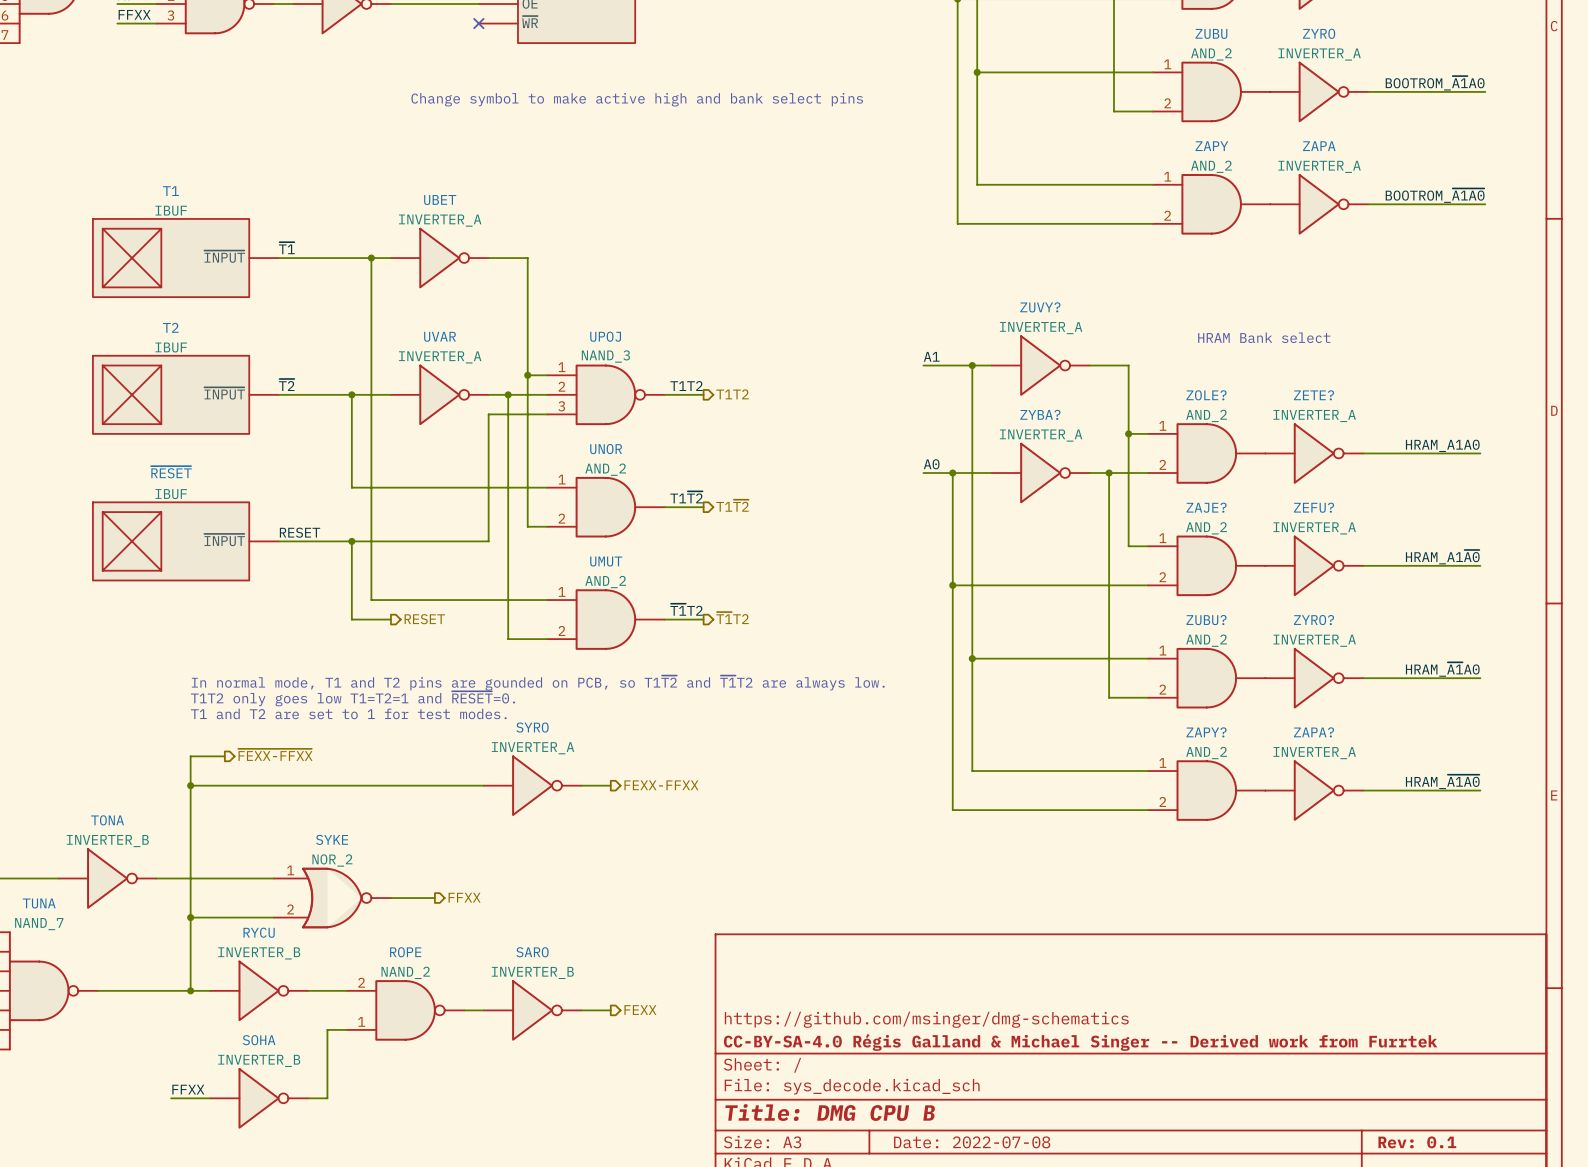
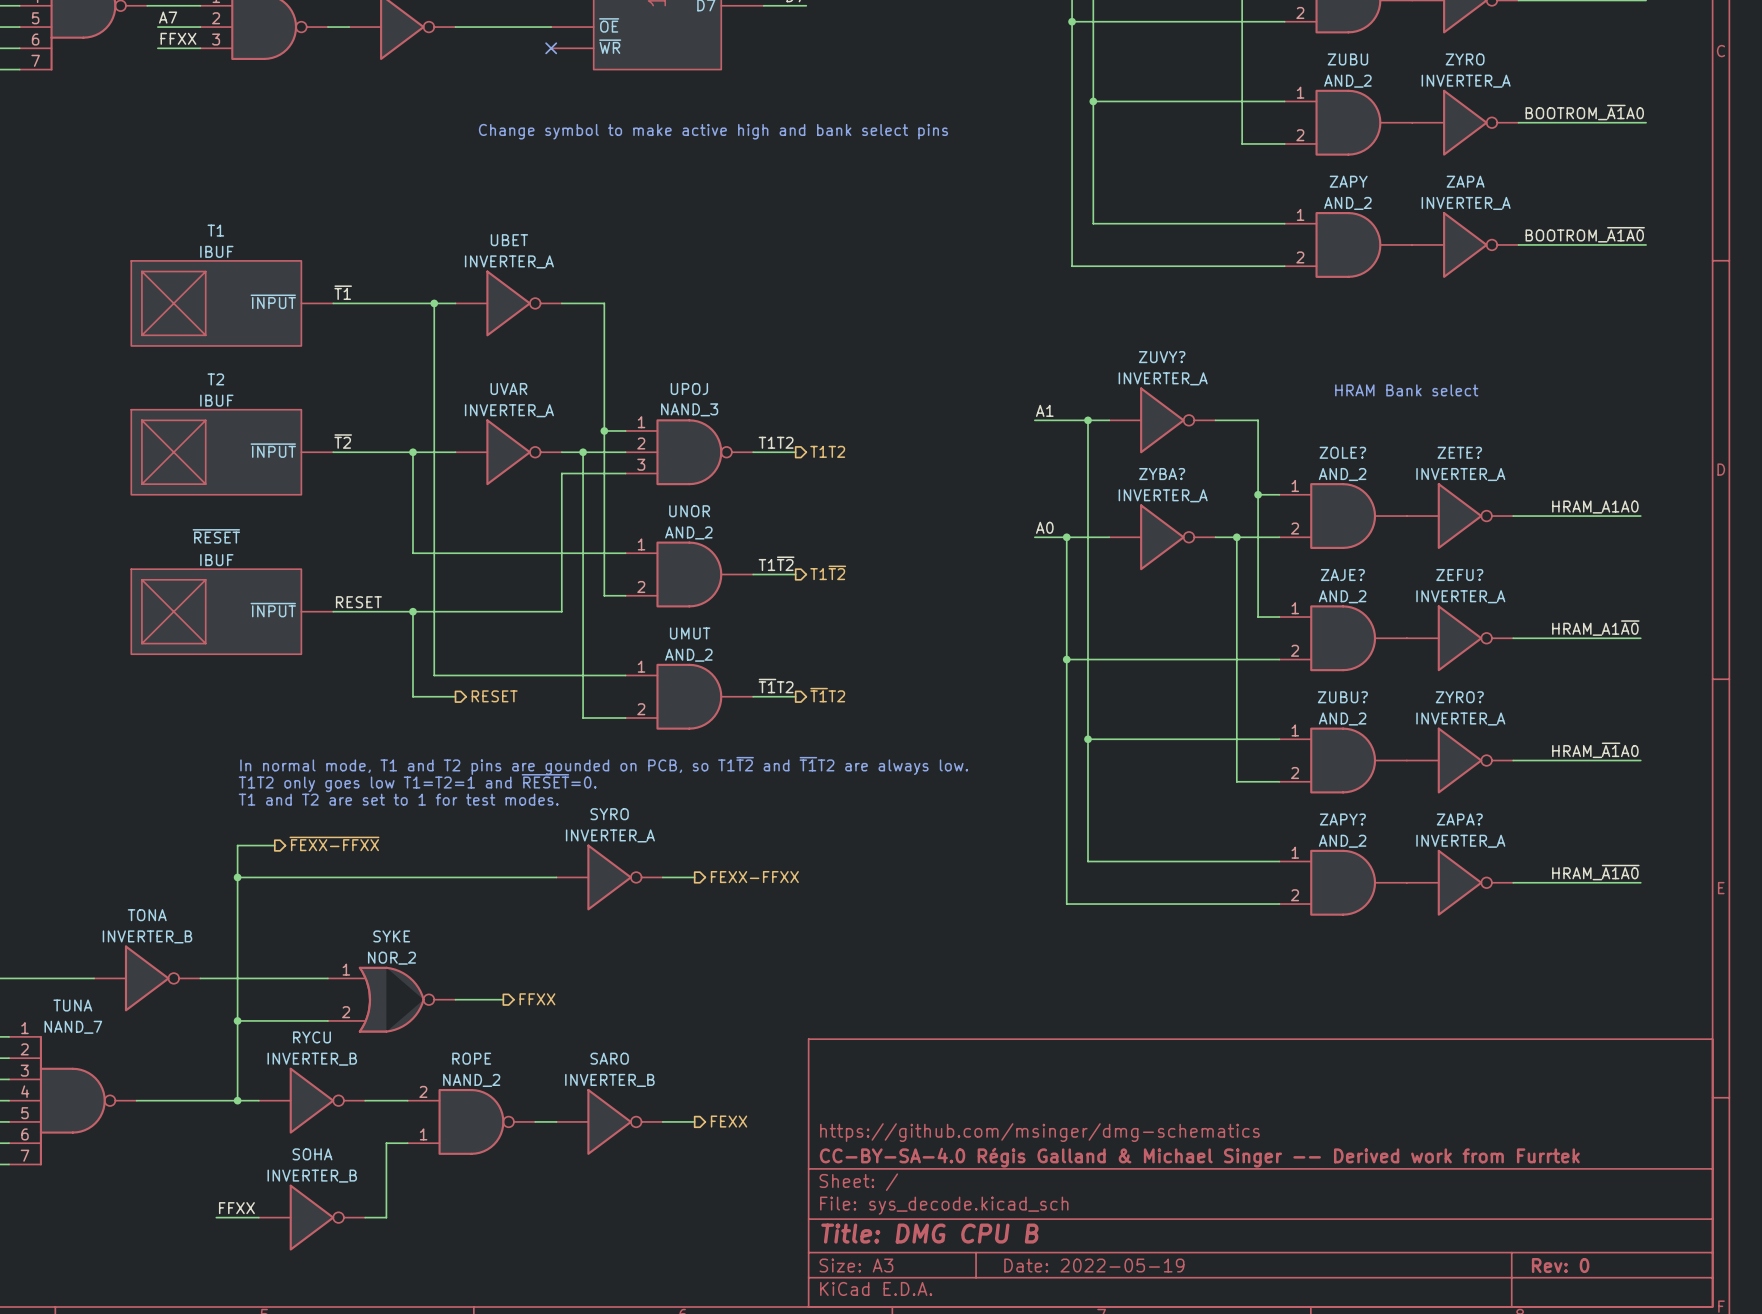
title block: Date: 2022-07-08 (972, 1142) -> Date: 2022-05-19 (1094, 1265)
title block: Rev: 0.1 (1417, 1142) -> Rev: 0 (1560, 1265)

